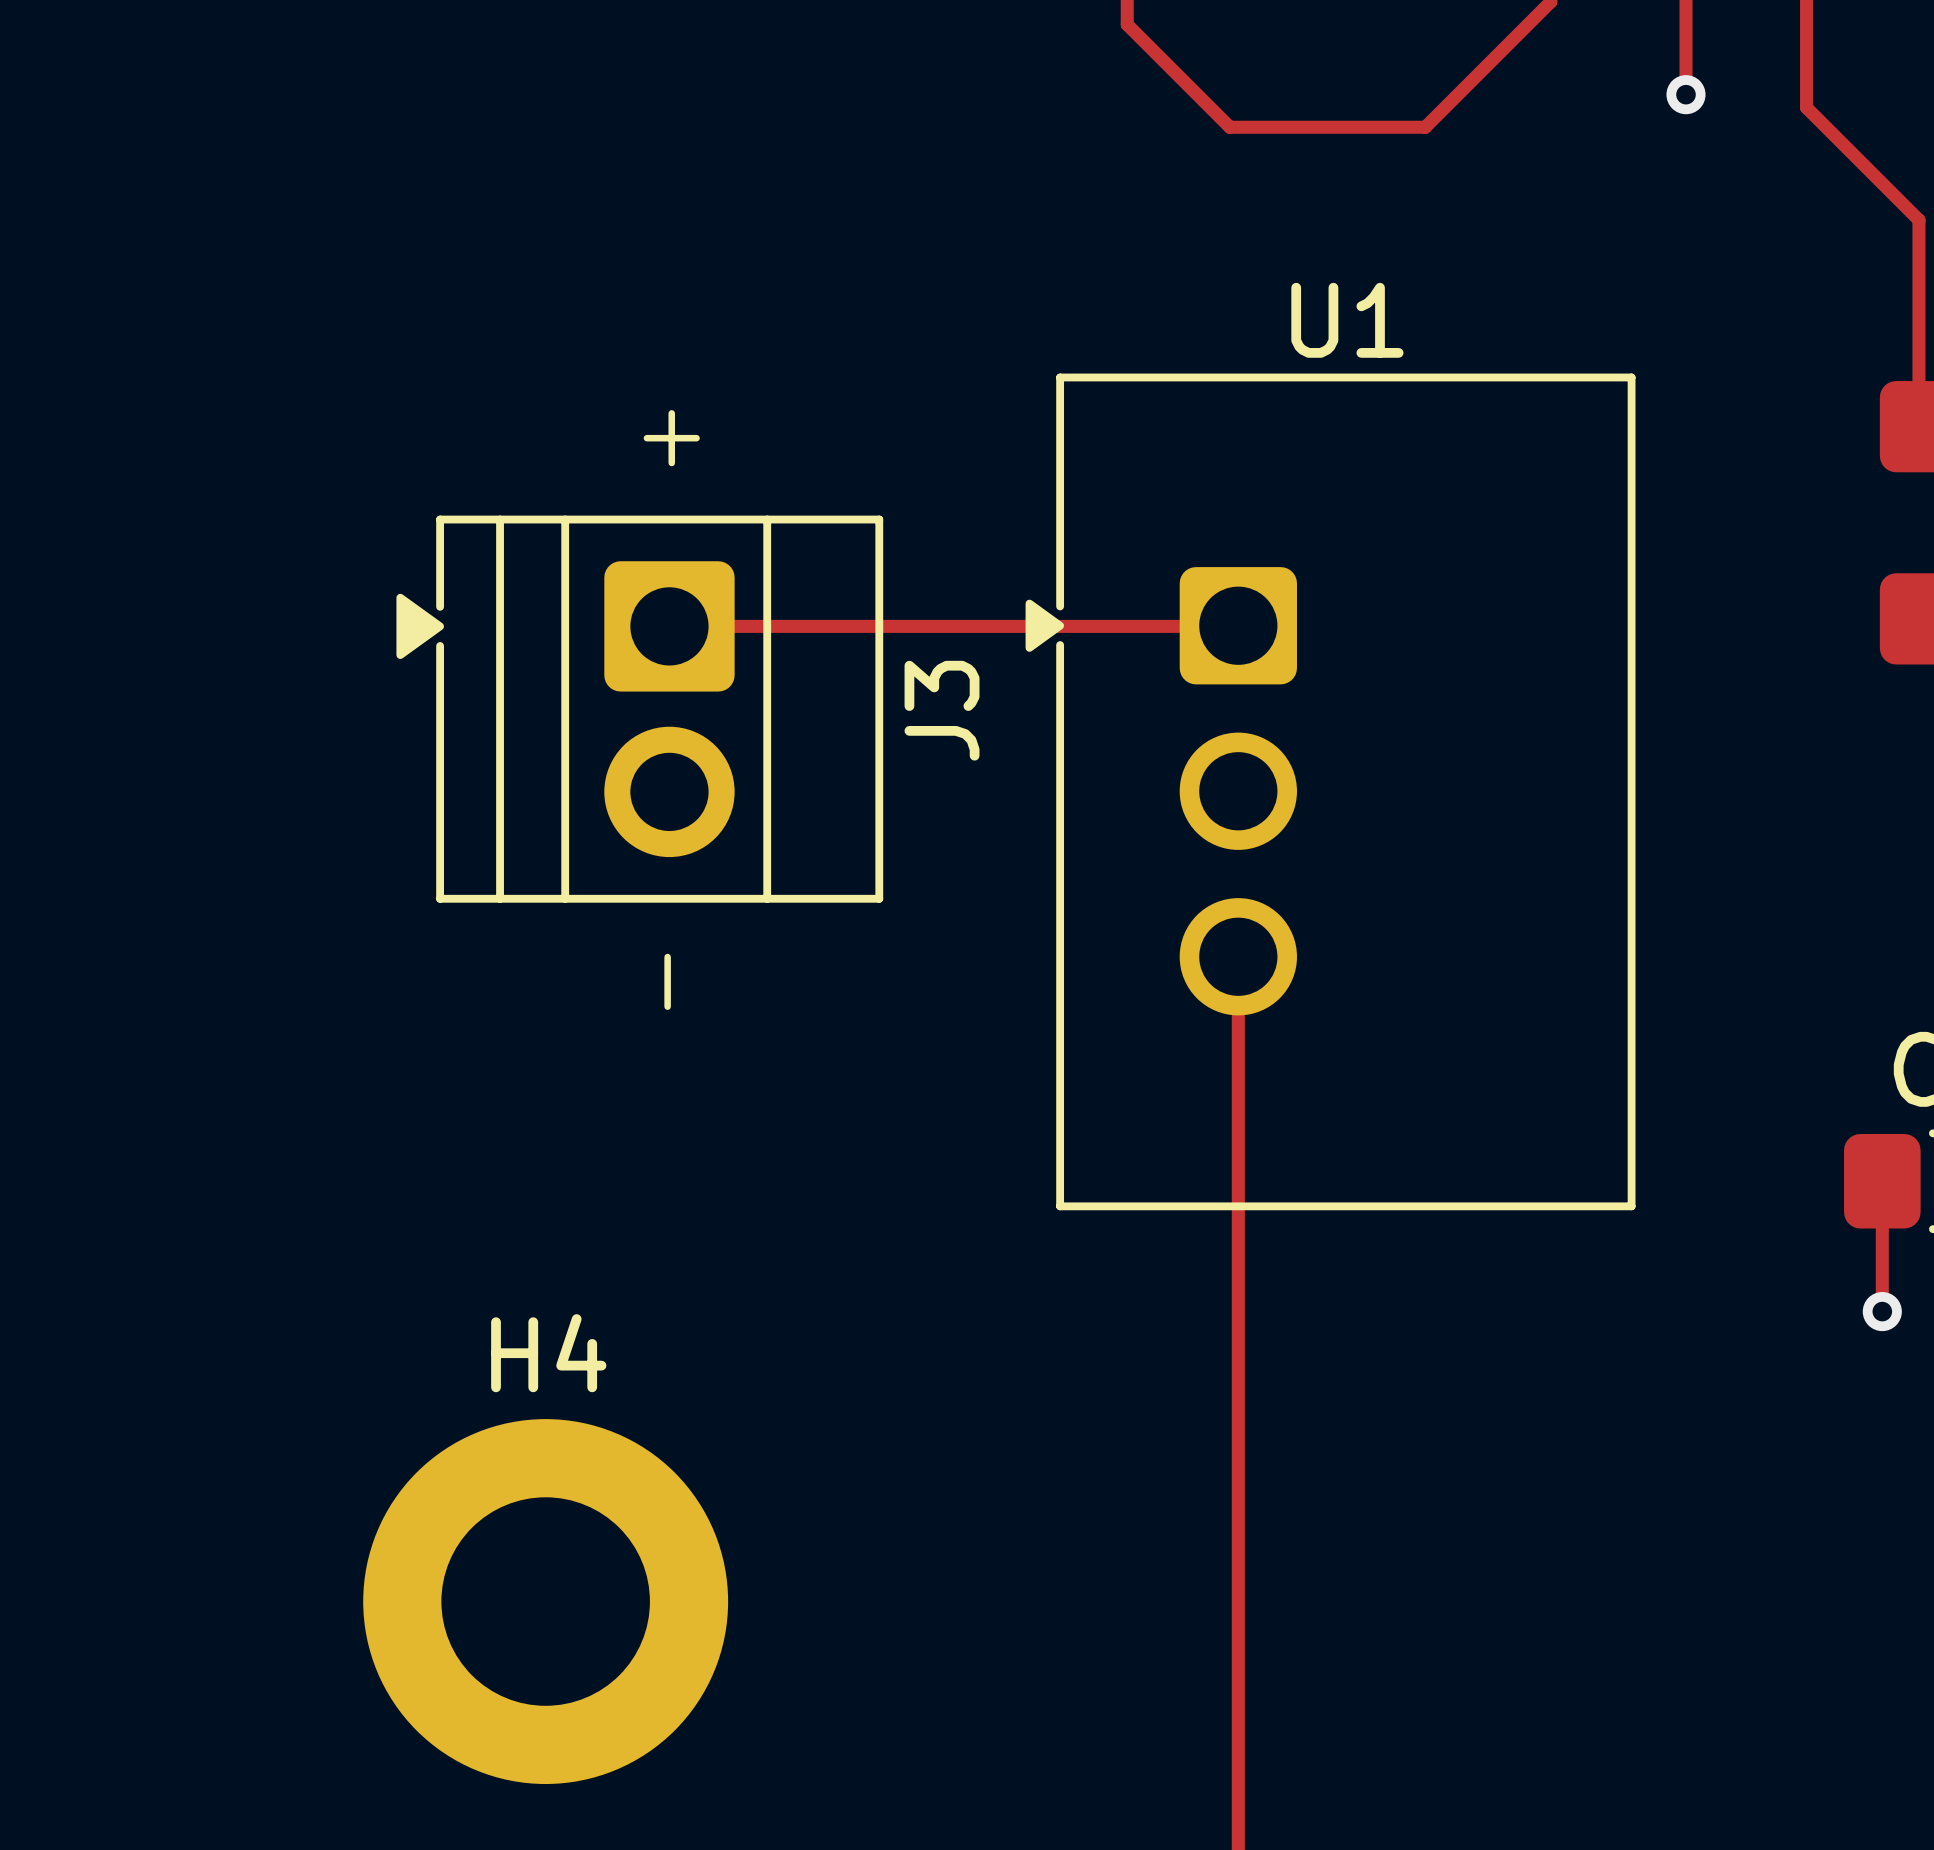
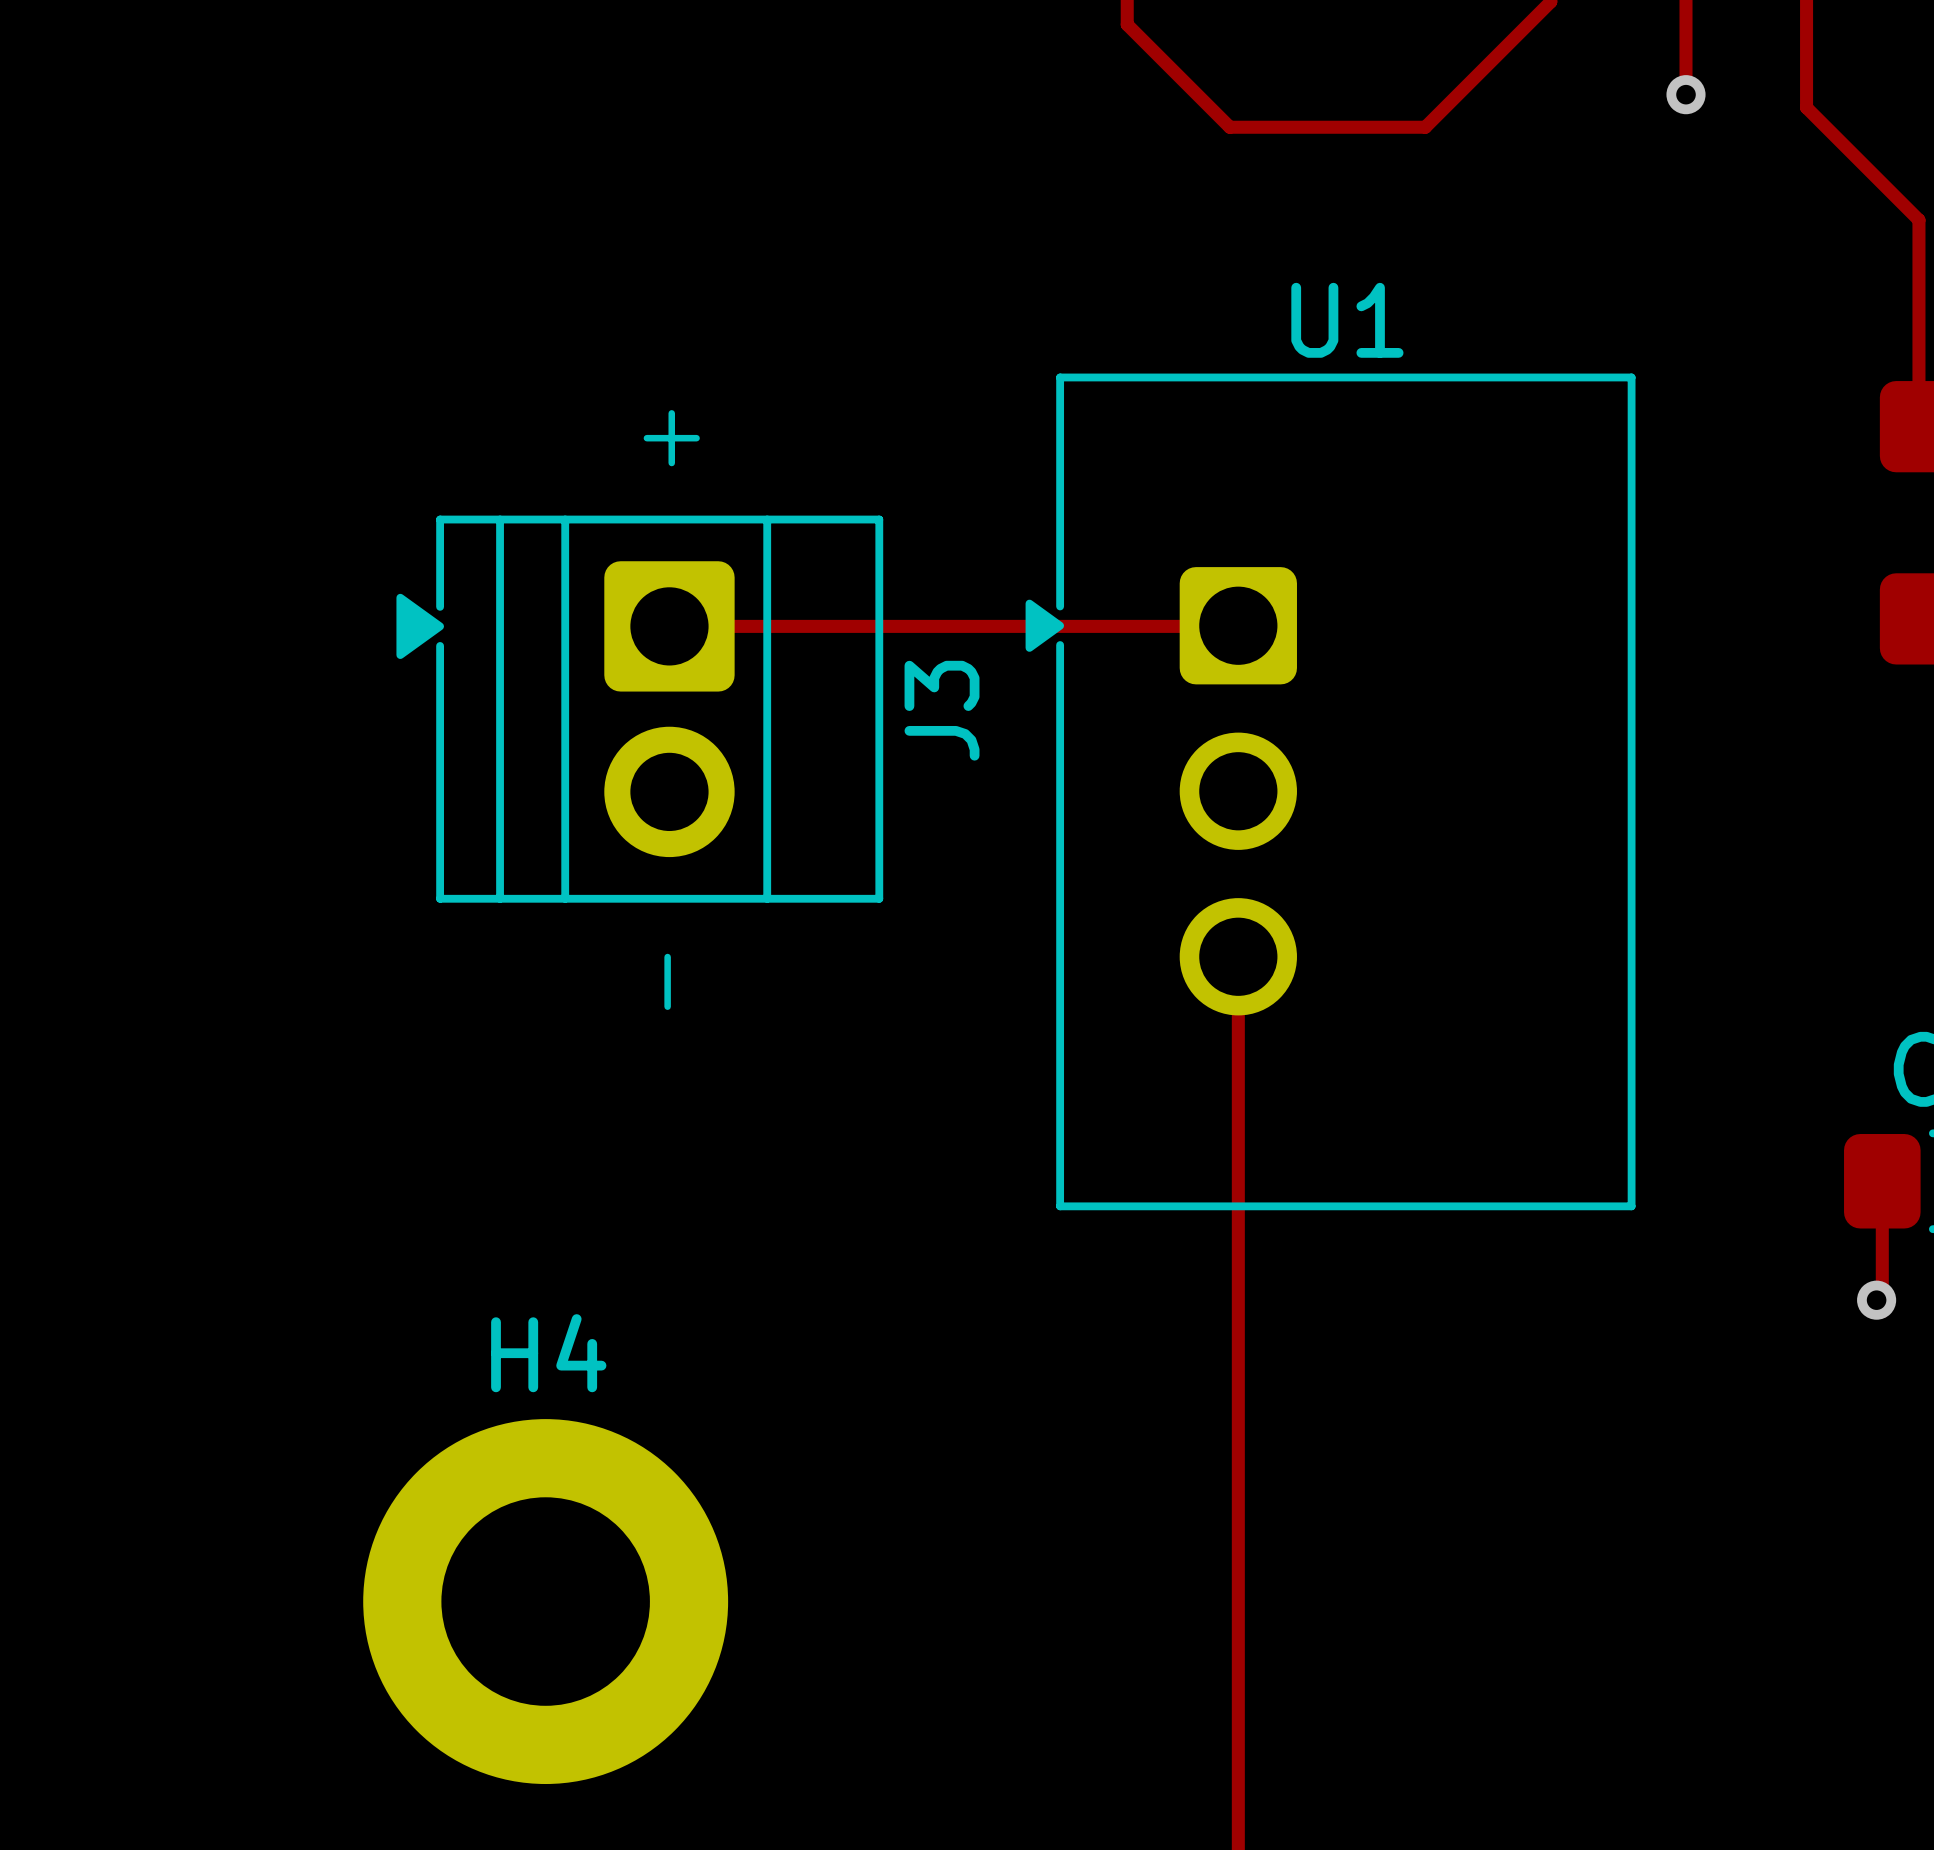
via position: (1882, 1311) -> (1876, 1300)

